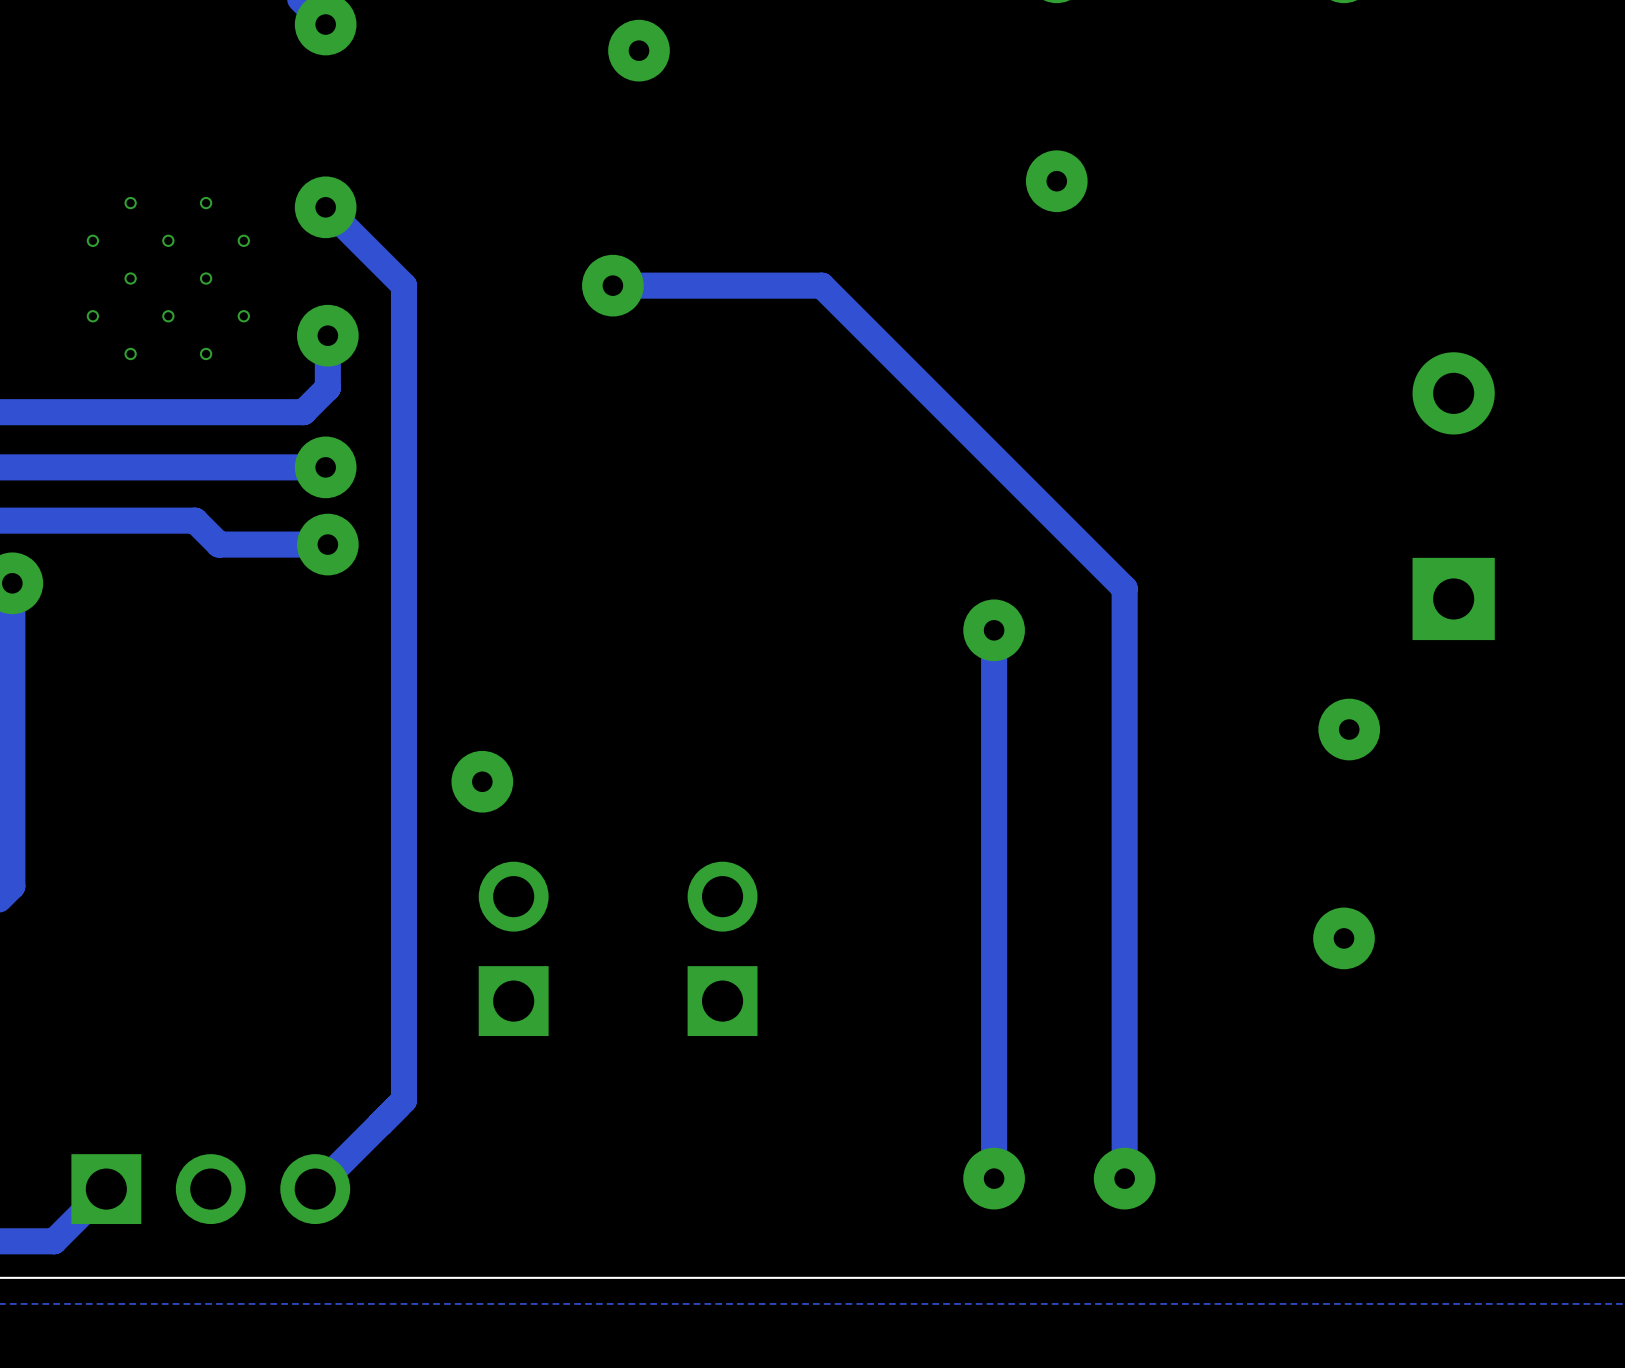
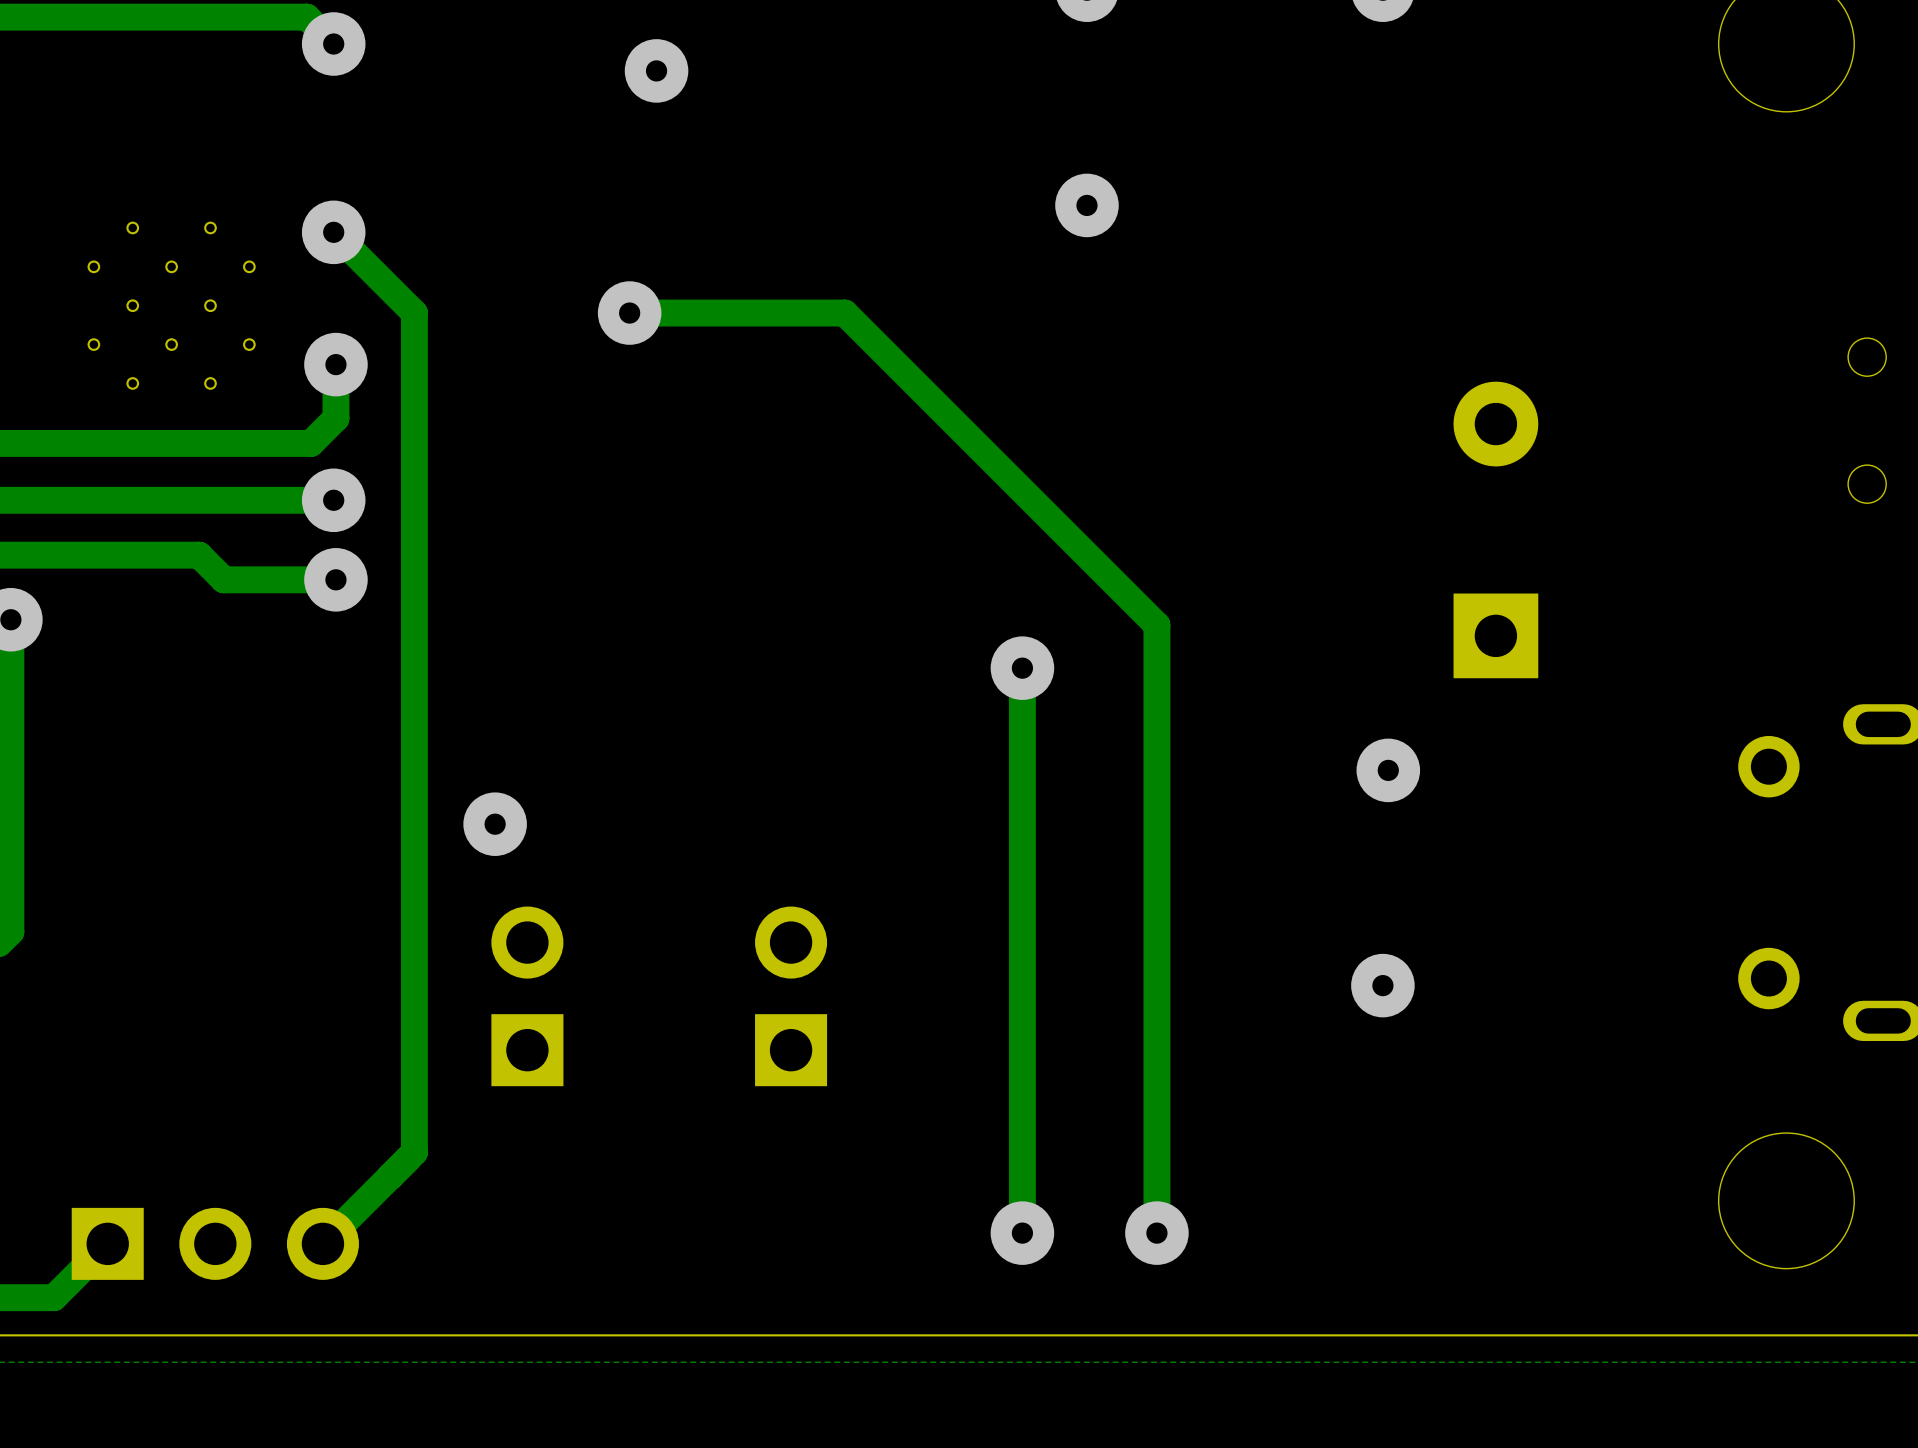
part position: (722, 948) -> (791, 996)

